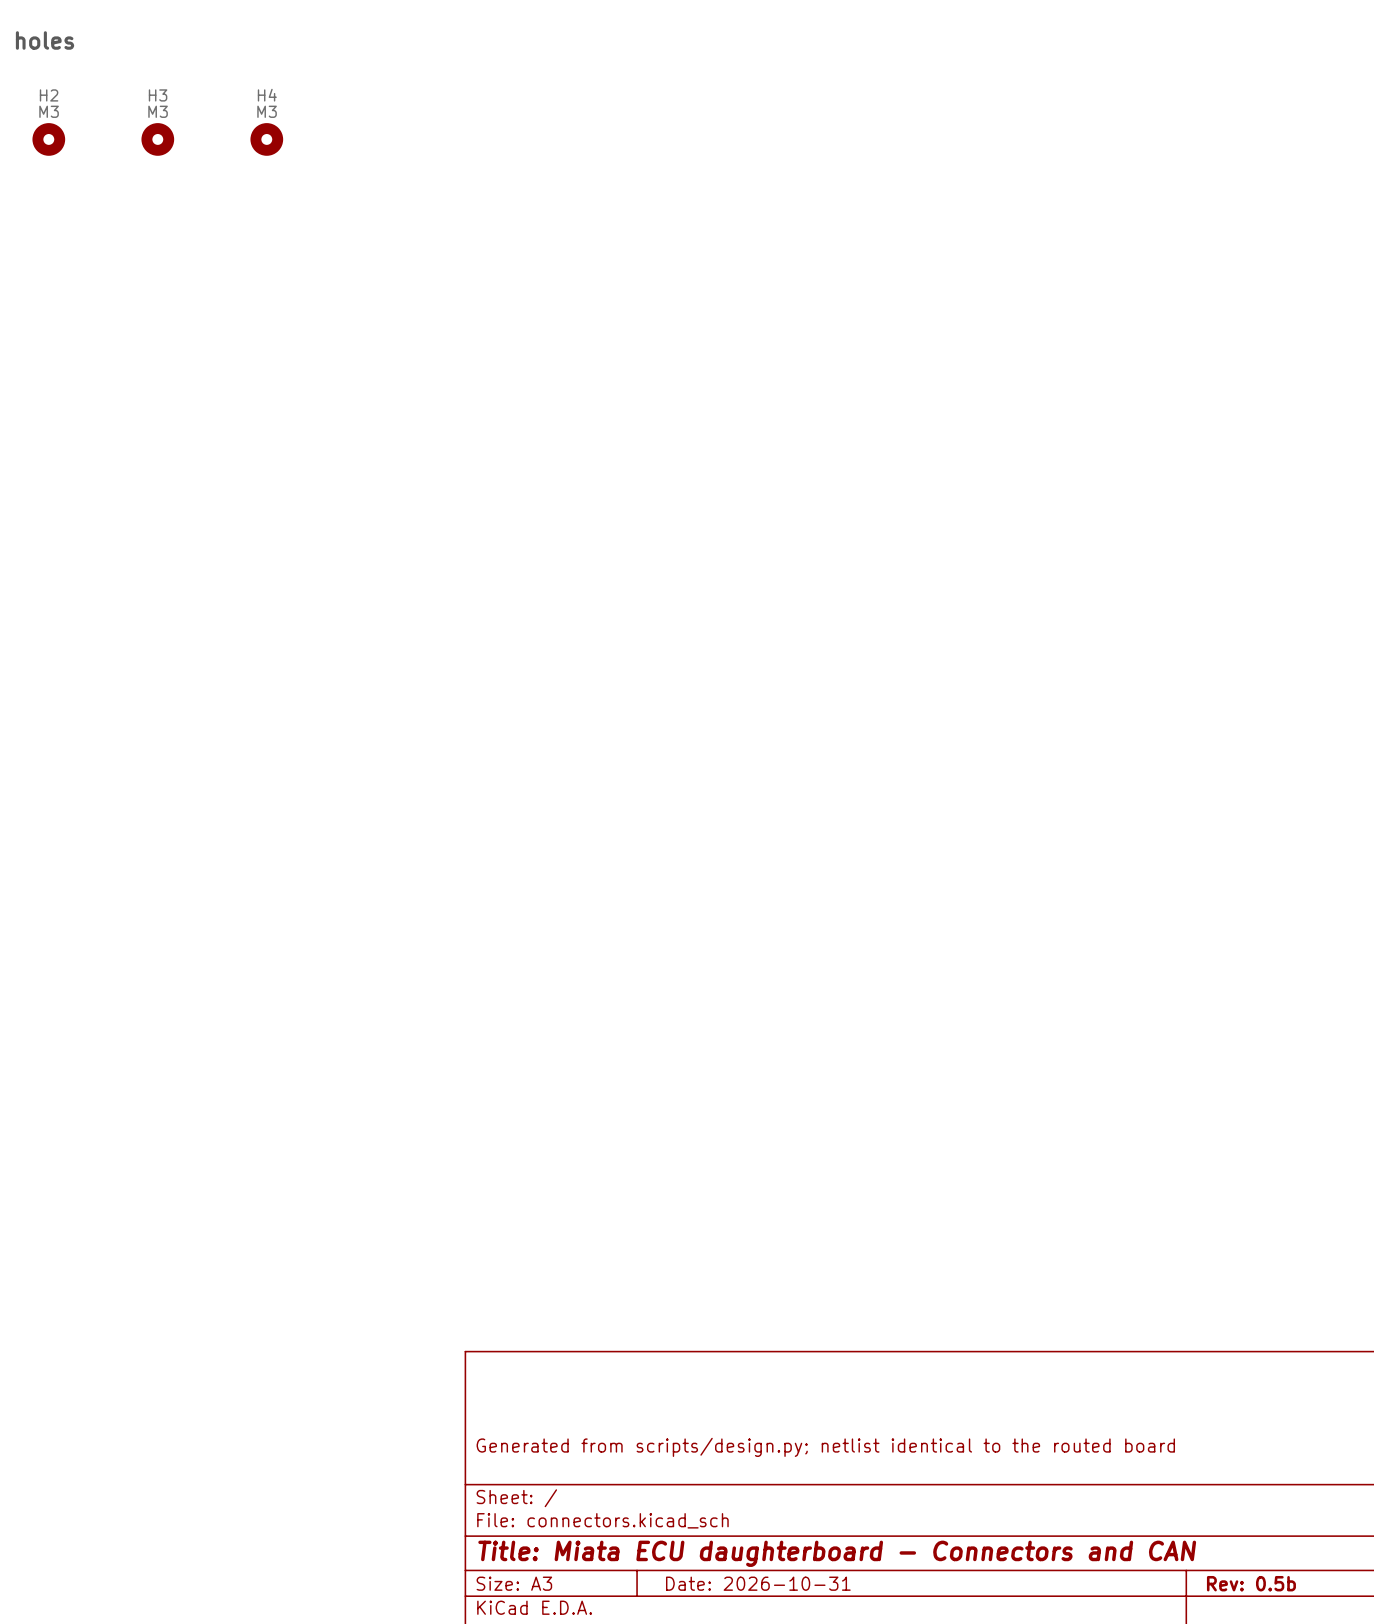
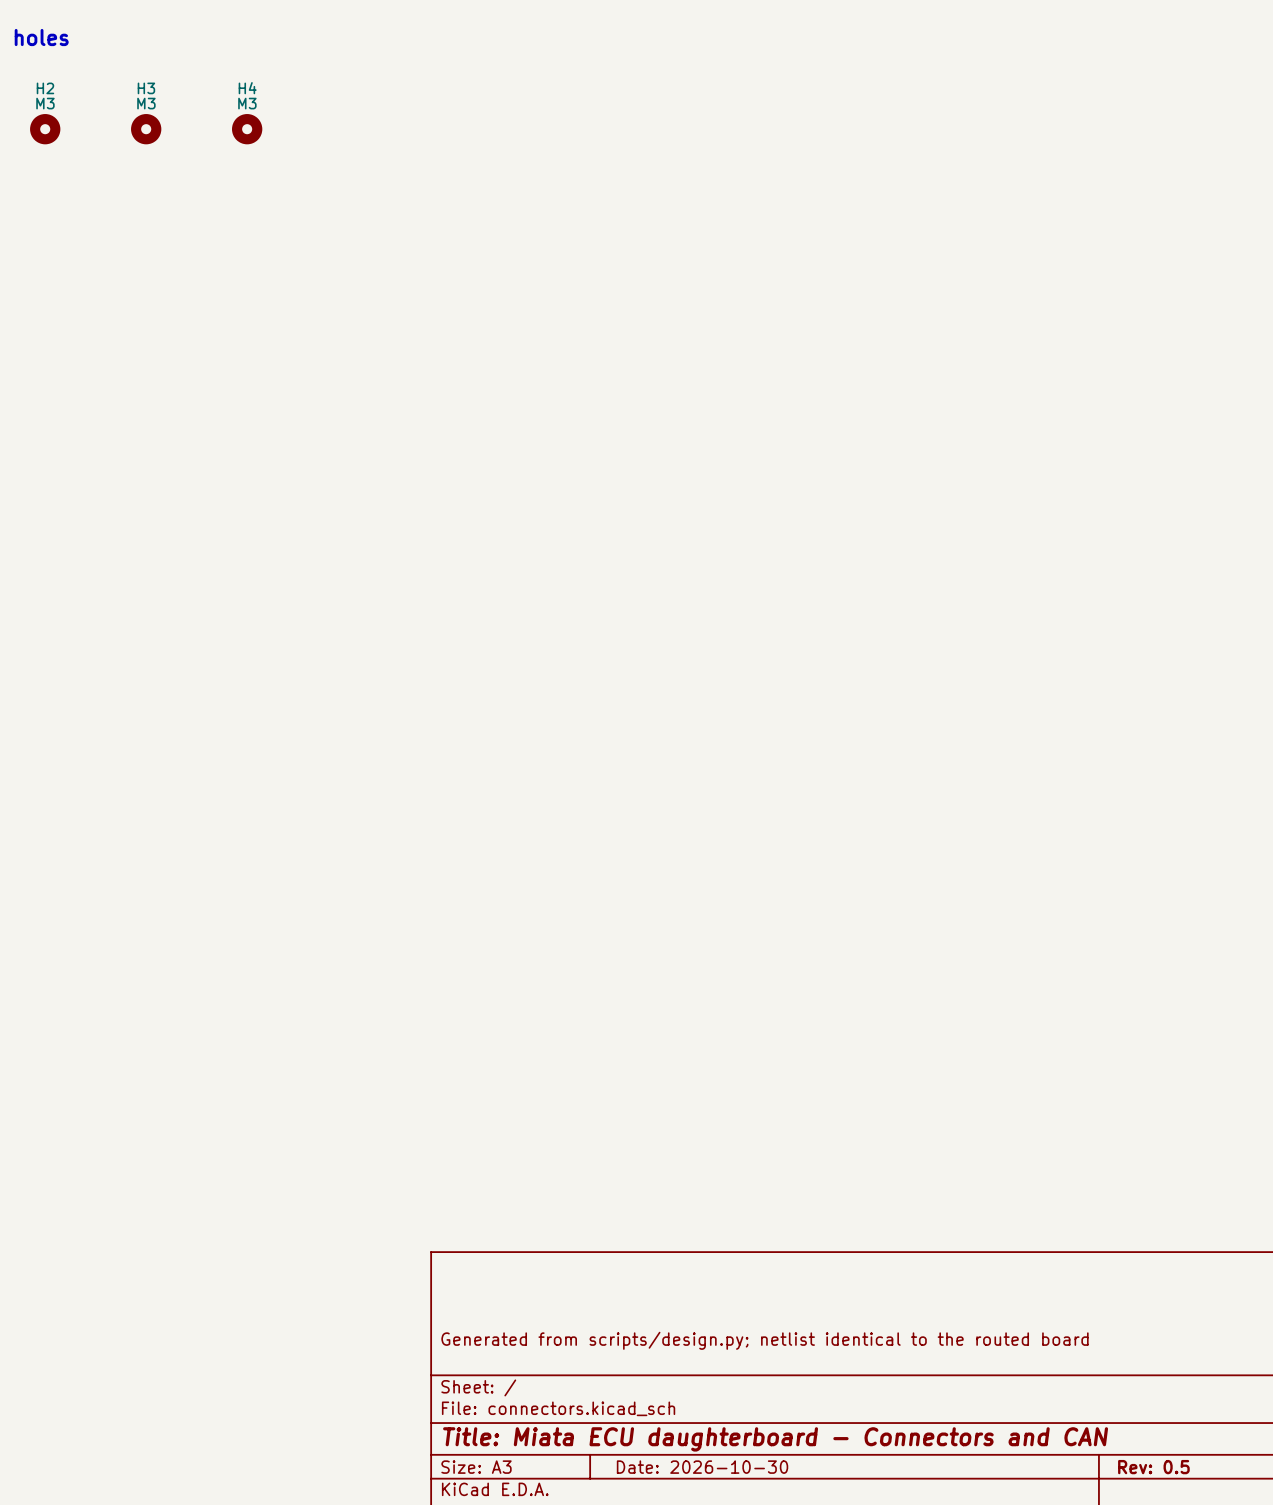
title block: Date: 2026-10-31 (758, 1583) -> Date: 2026-10-30 (702, 1467)
title block: Rev: 0.5b (1251, 1583) -> Rev: 0.5 (1153, 1467)

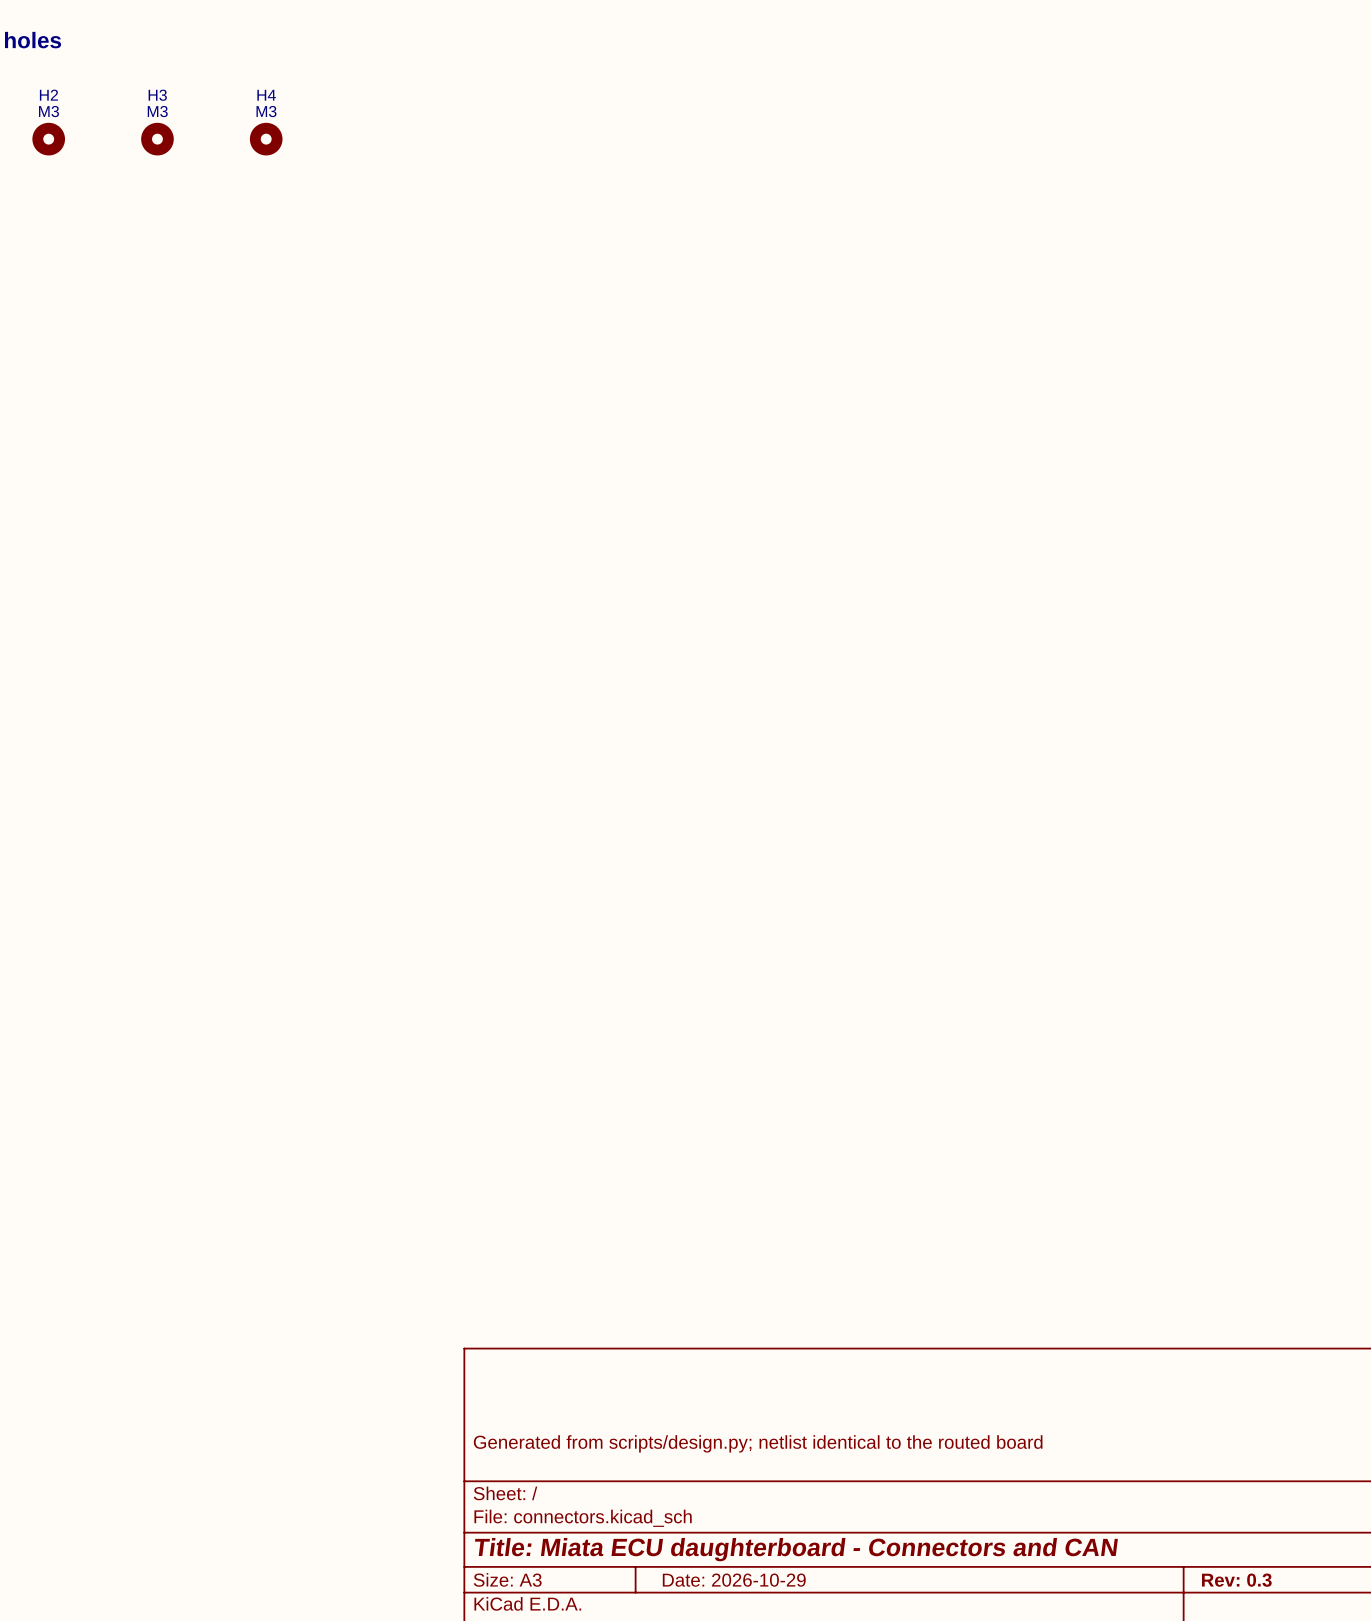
title block: Date: 2026-10-30 (702, 1467) -> Date: 2026-10-29 (734, 1580)
title block: Rev: 0.5 (1153, 1467) -> Rev: 0.3 (1236, 1580)

